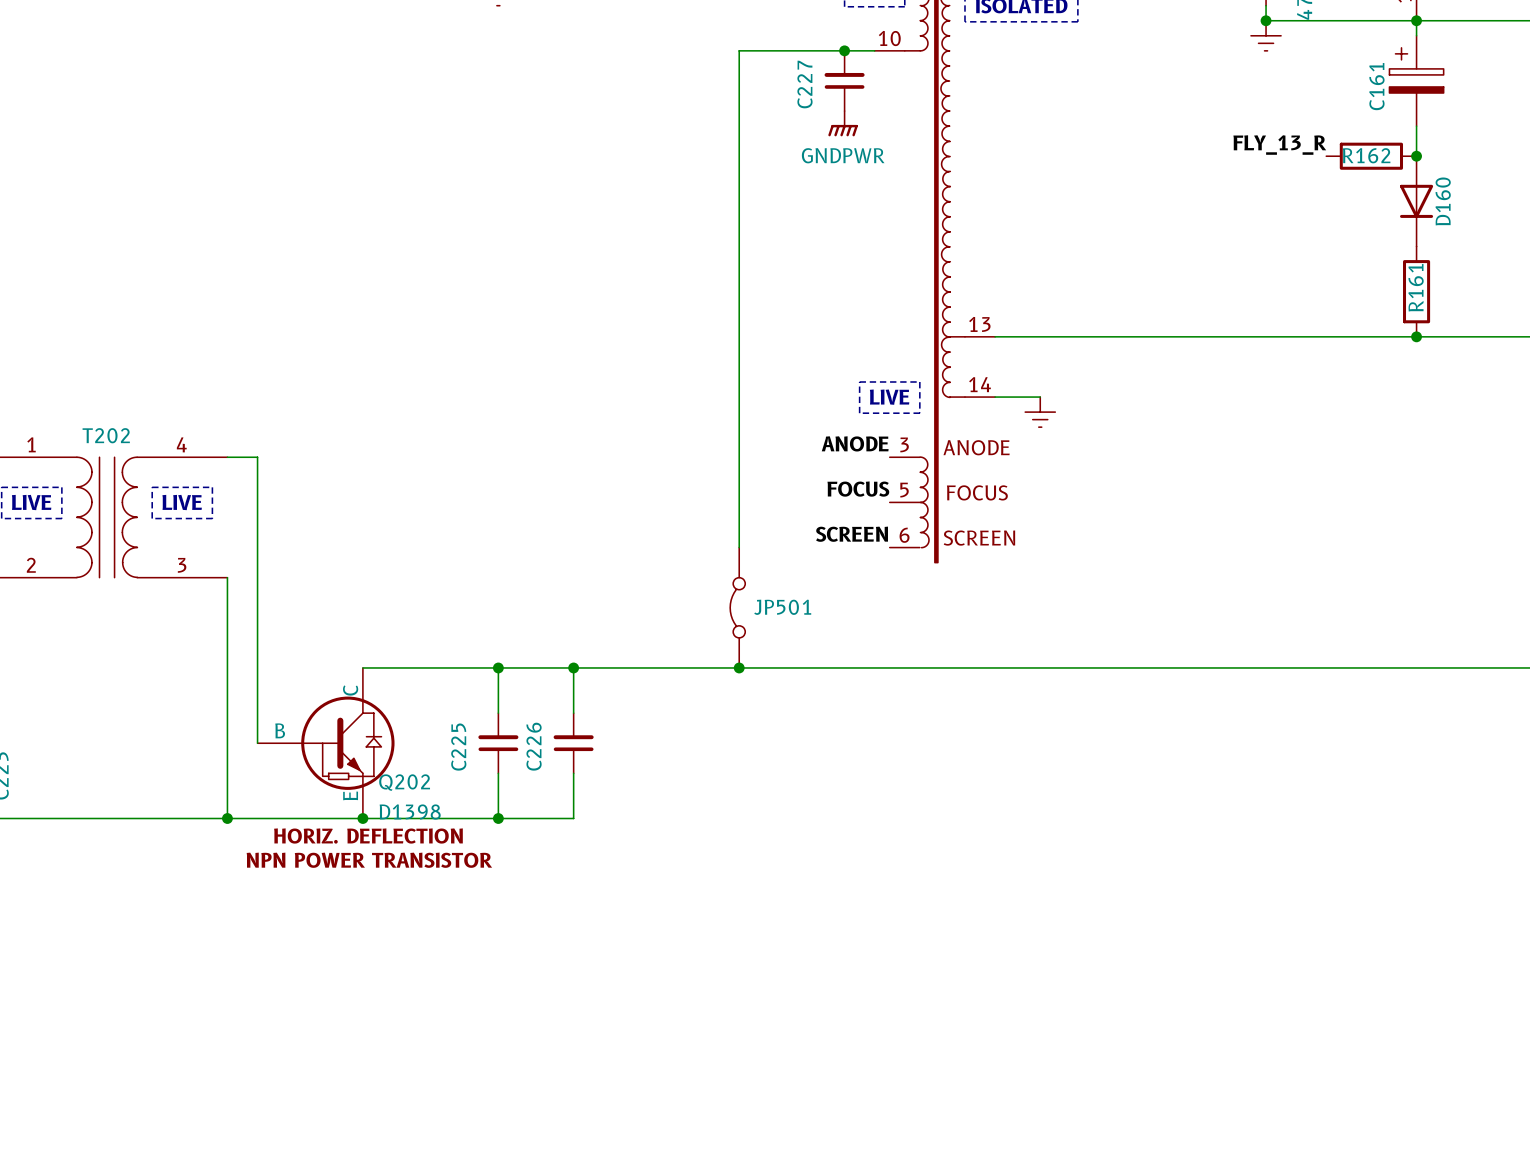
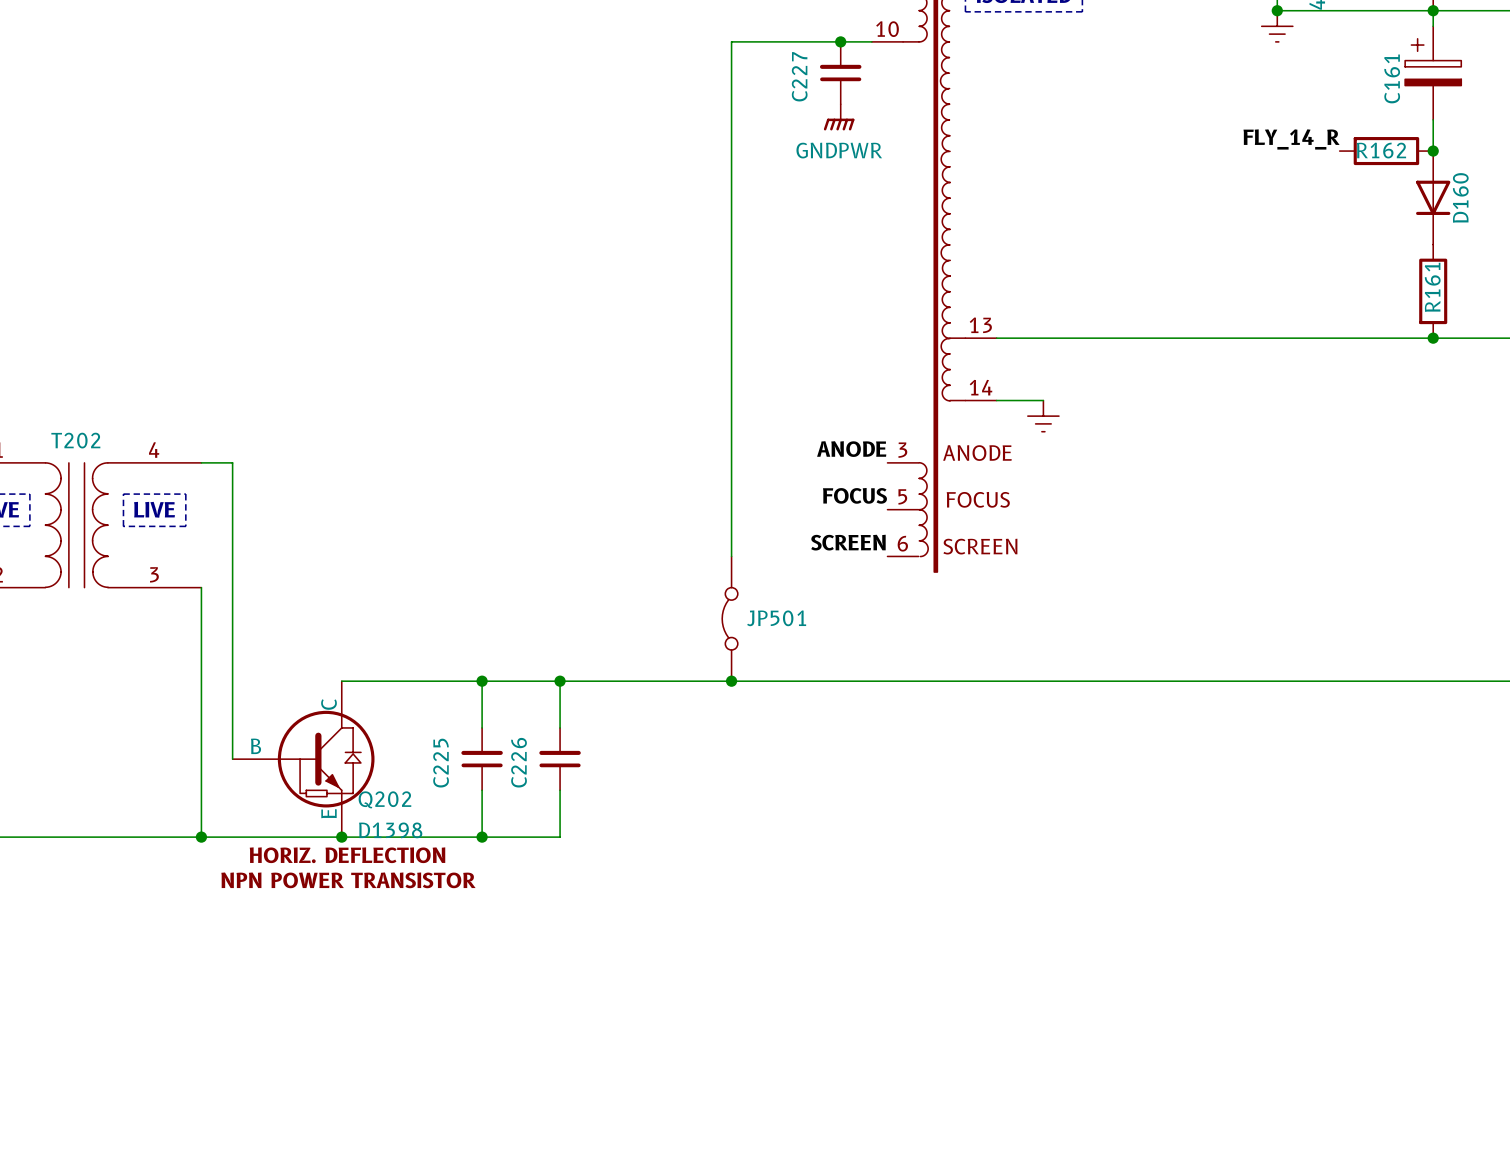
label: FLY_13_R (1279, 145) -> FLY_14_R (1291, 139)
line: (859, 381) (919, 381) (919, 413) (859, 413) (859, 381) -> none
text: LIVE (889, 397) -> none

